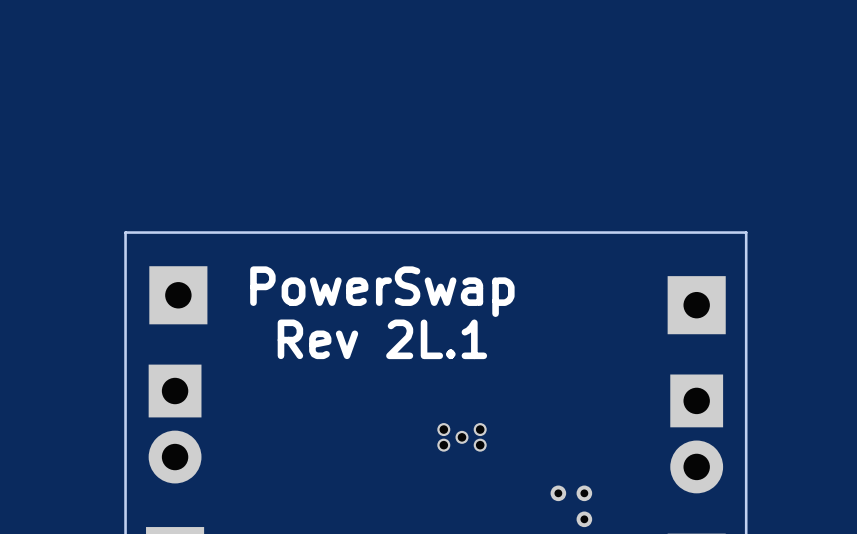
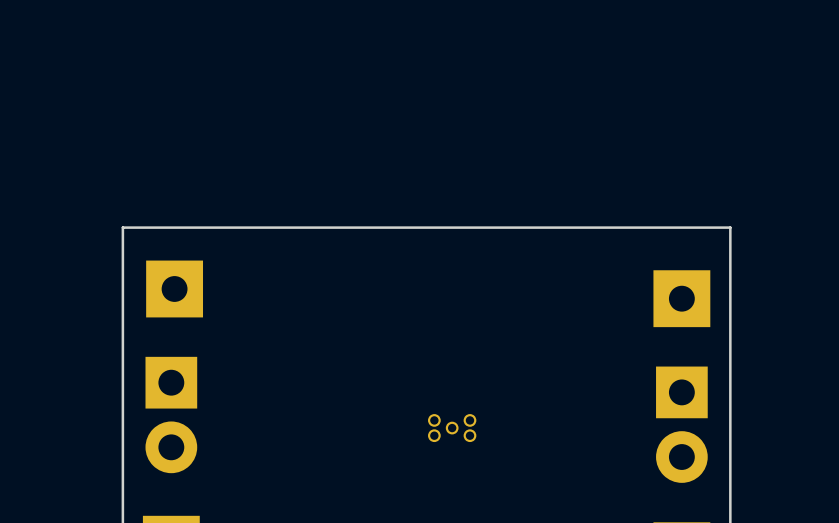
text: PowerSwap (382, 291) -> none
text: Rev 2L.1 (382, 339) -> none
part: (558, 493) -> none
part: (584, 493) -> none
part: (584, 519) -> none

